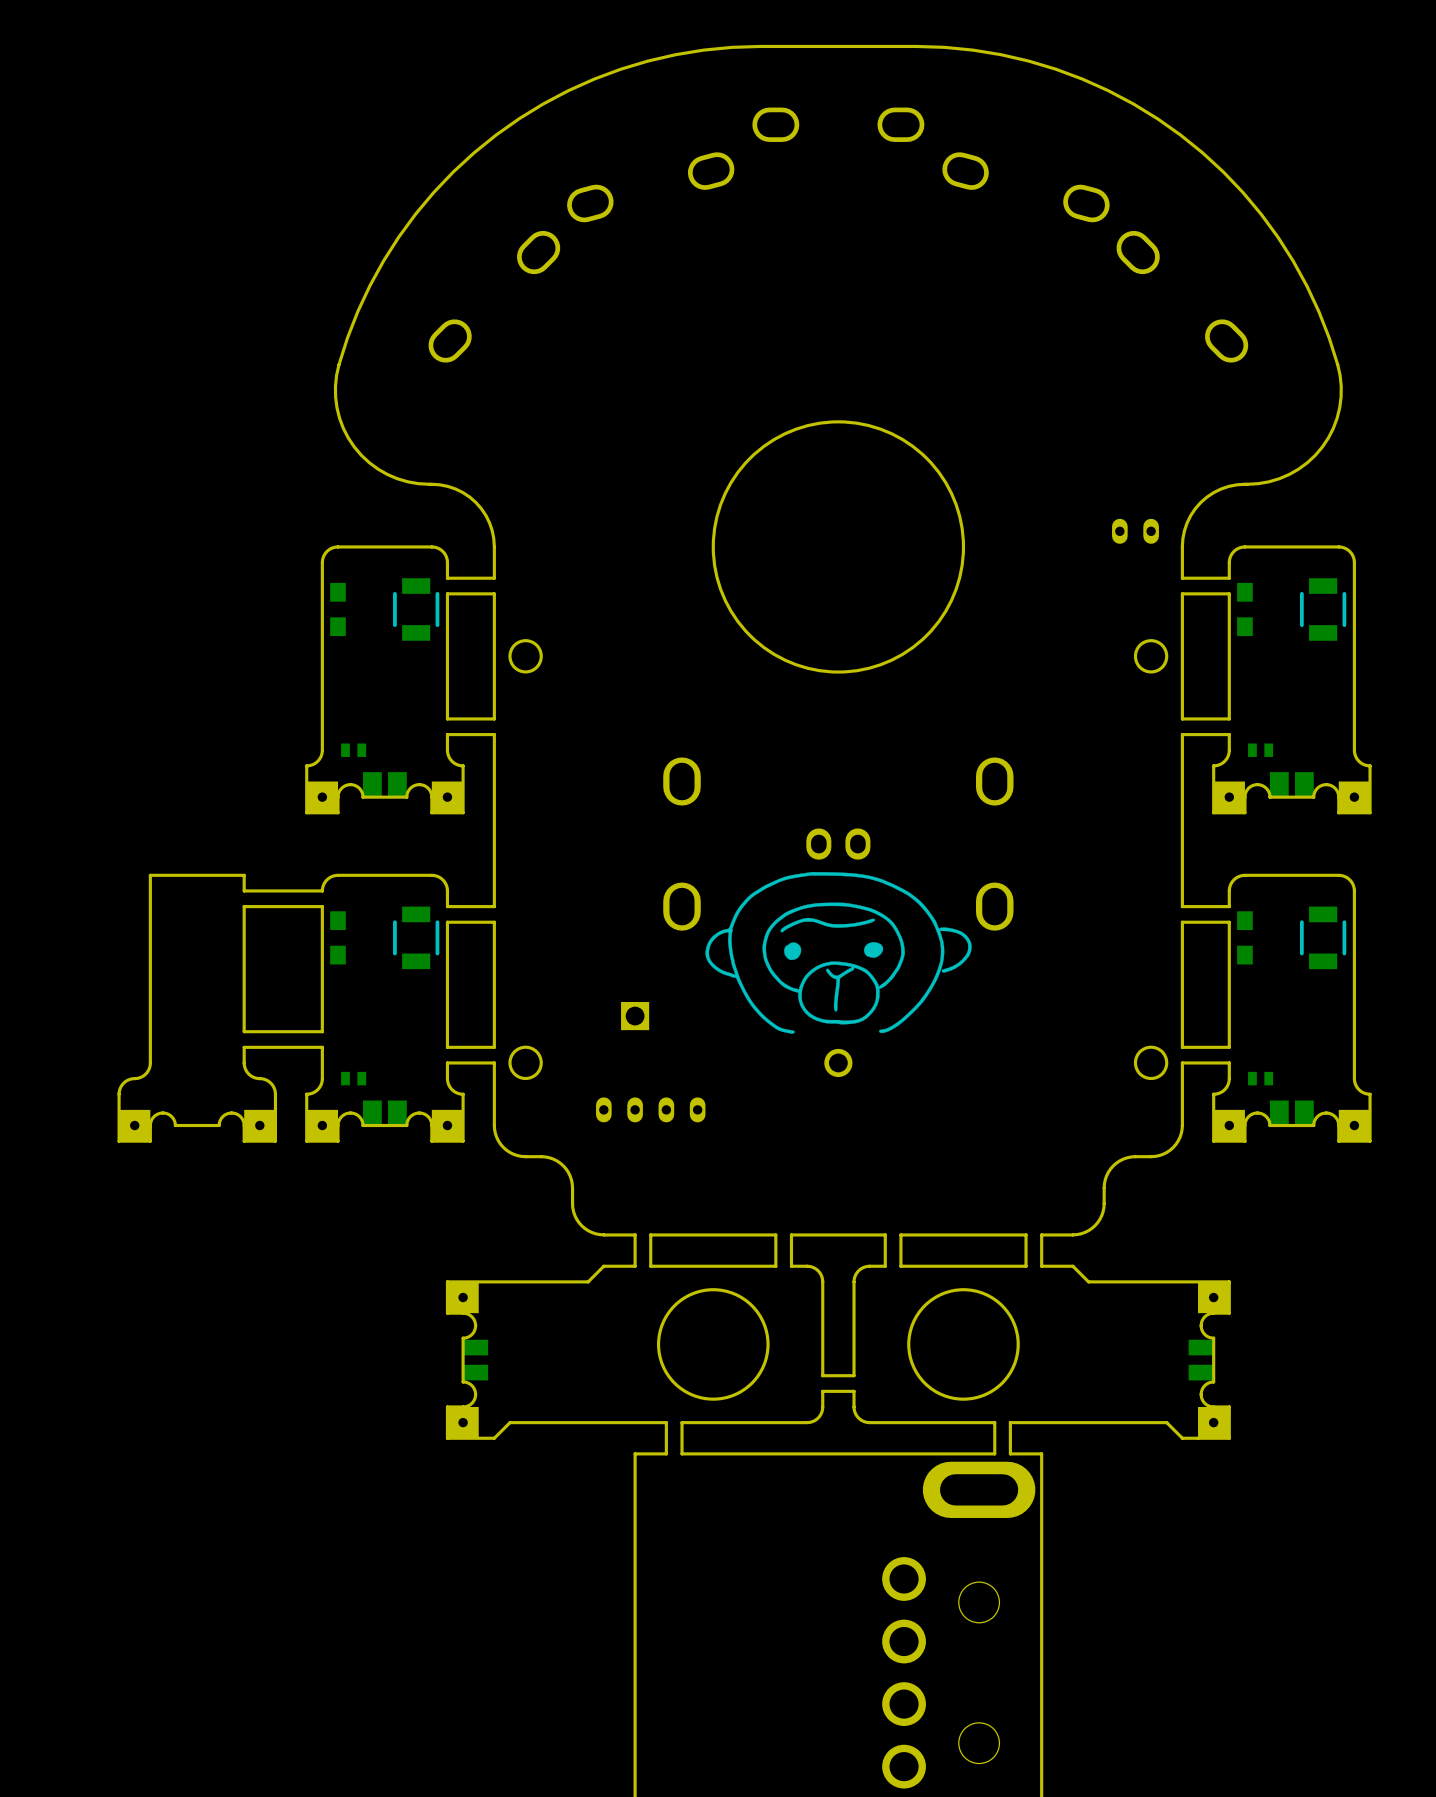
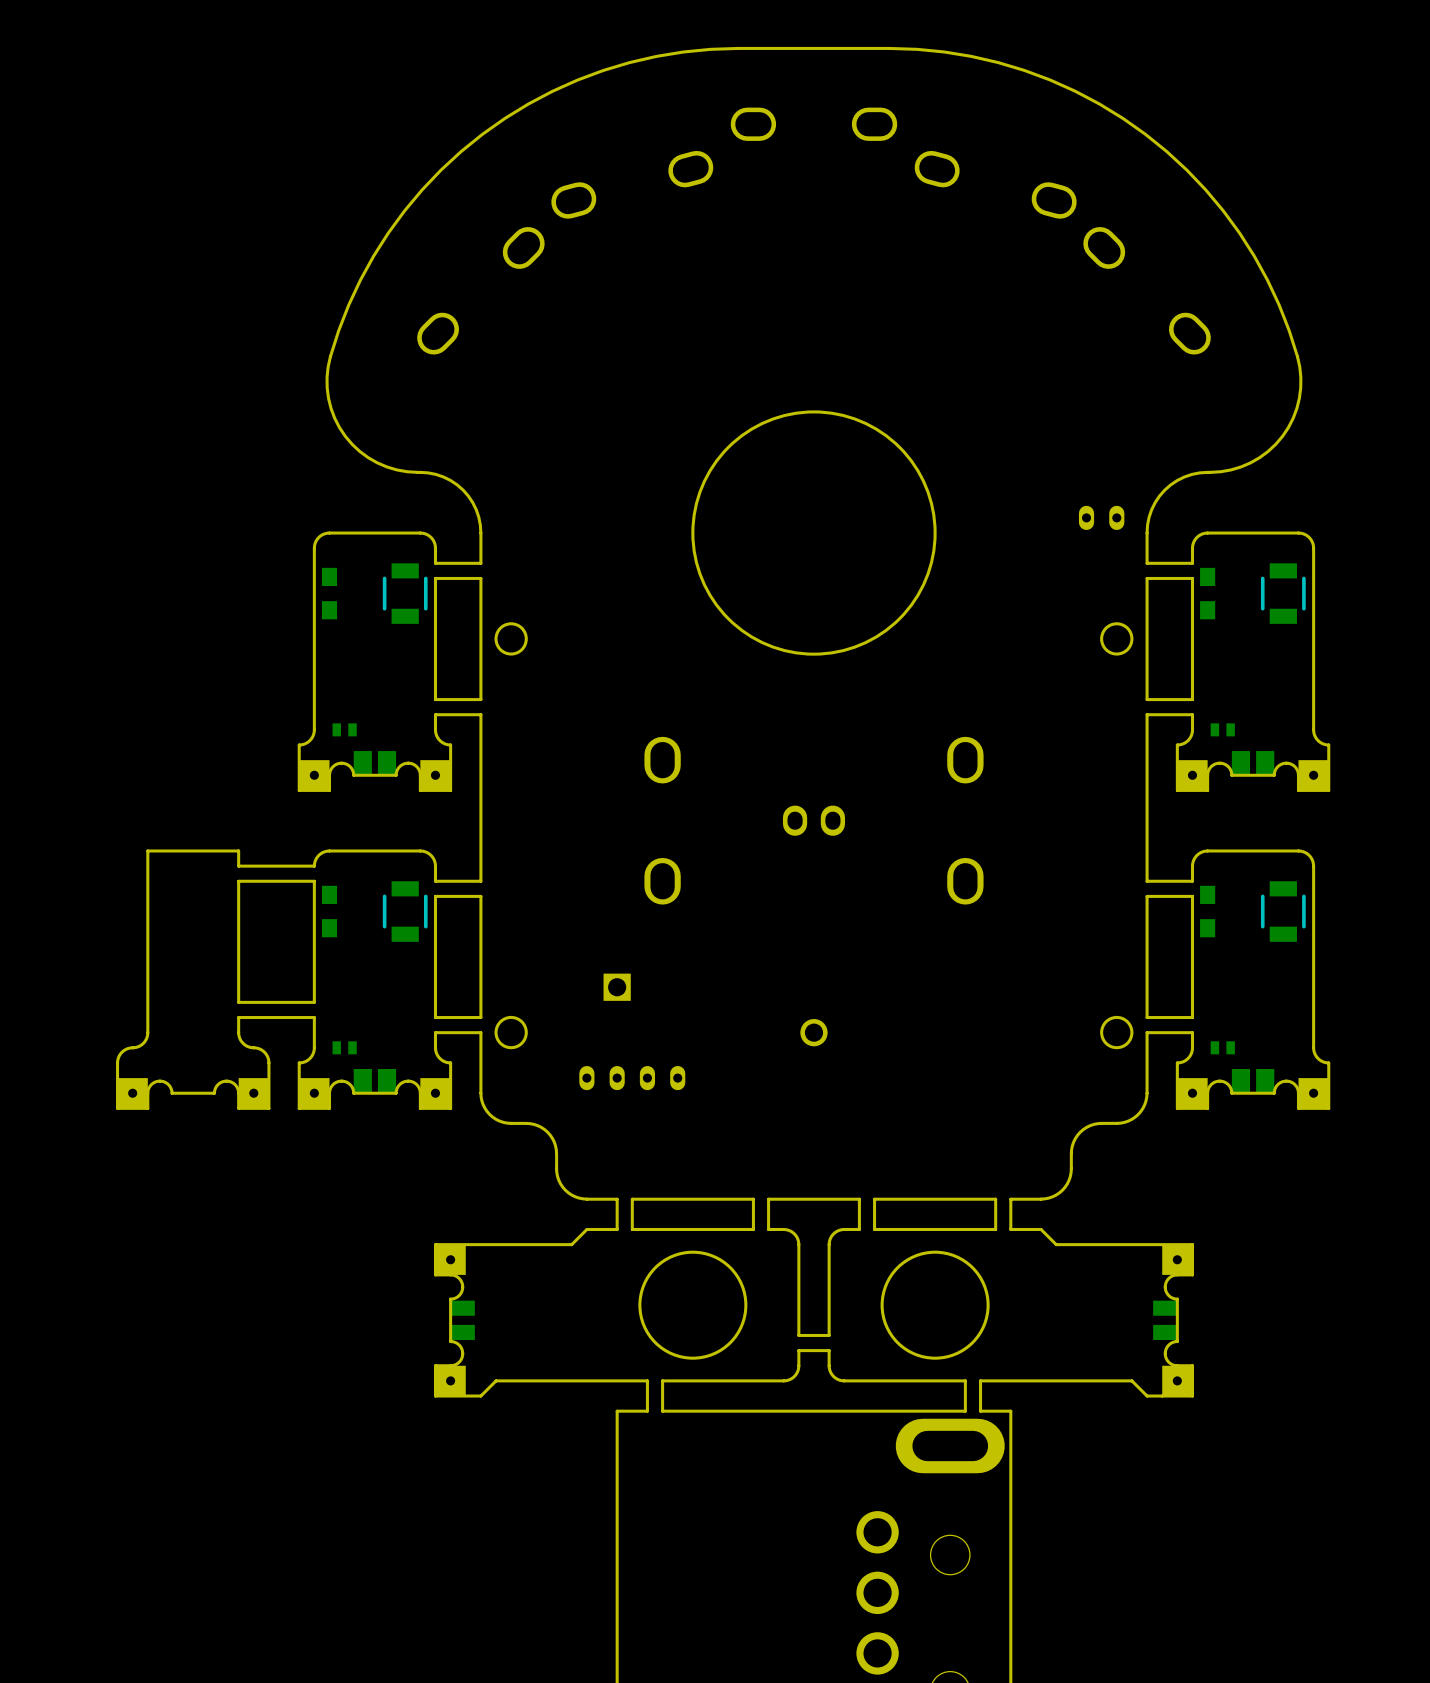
drawing: [705, 871, 972, 1034] -> none

